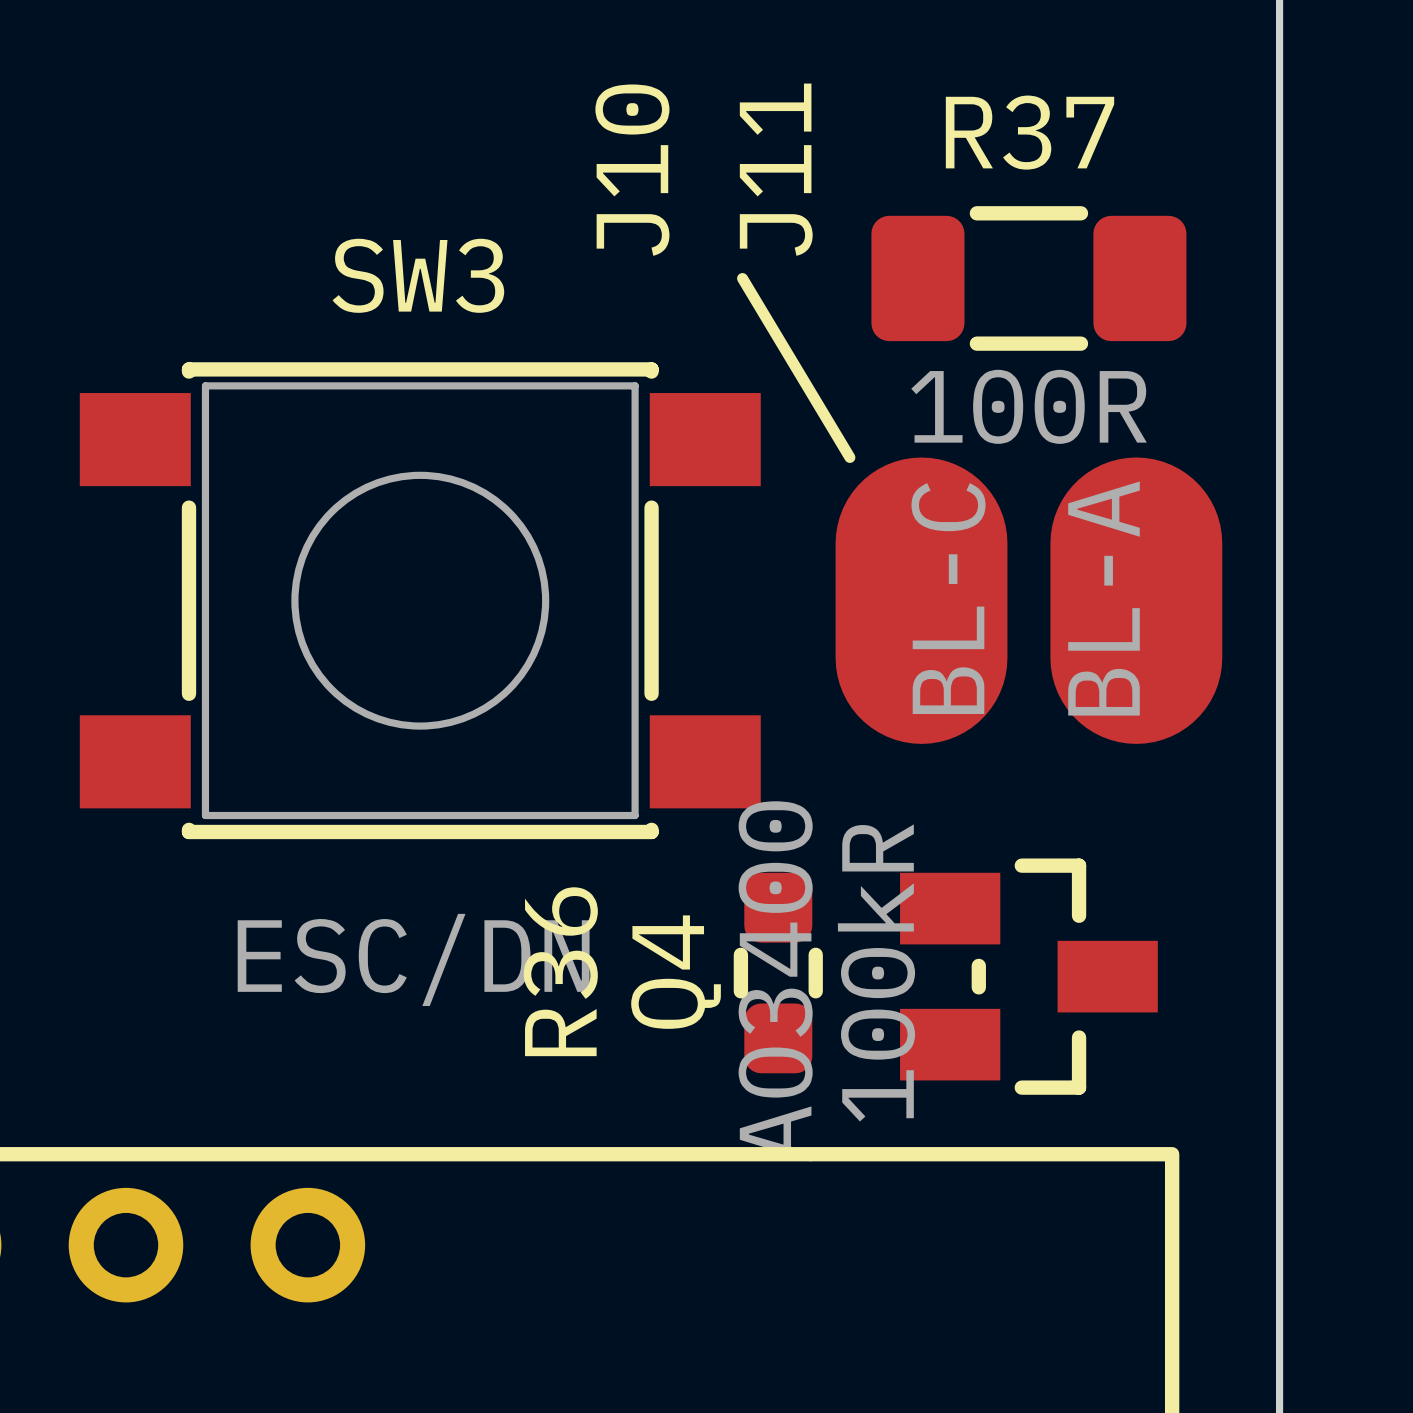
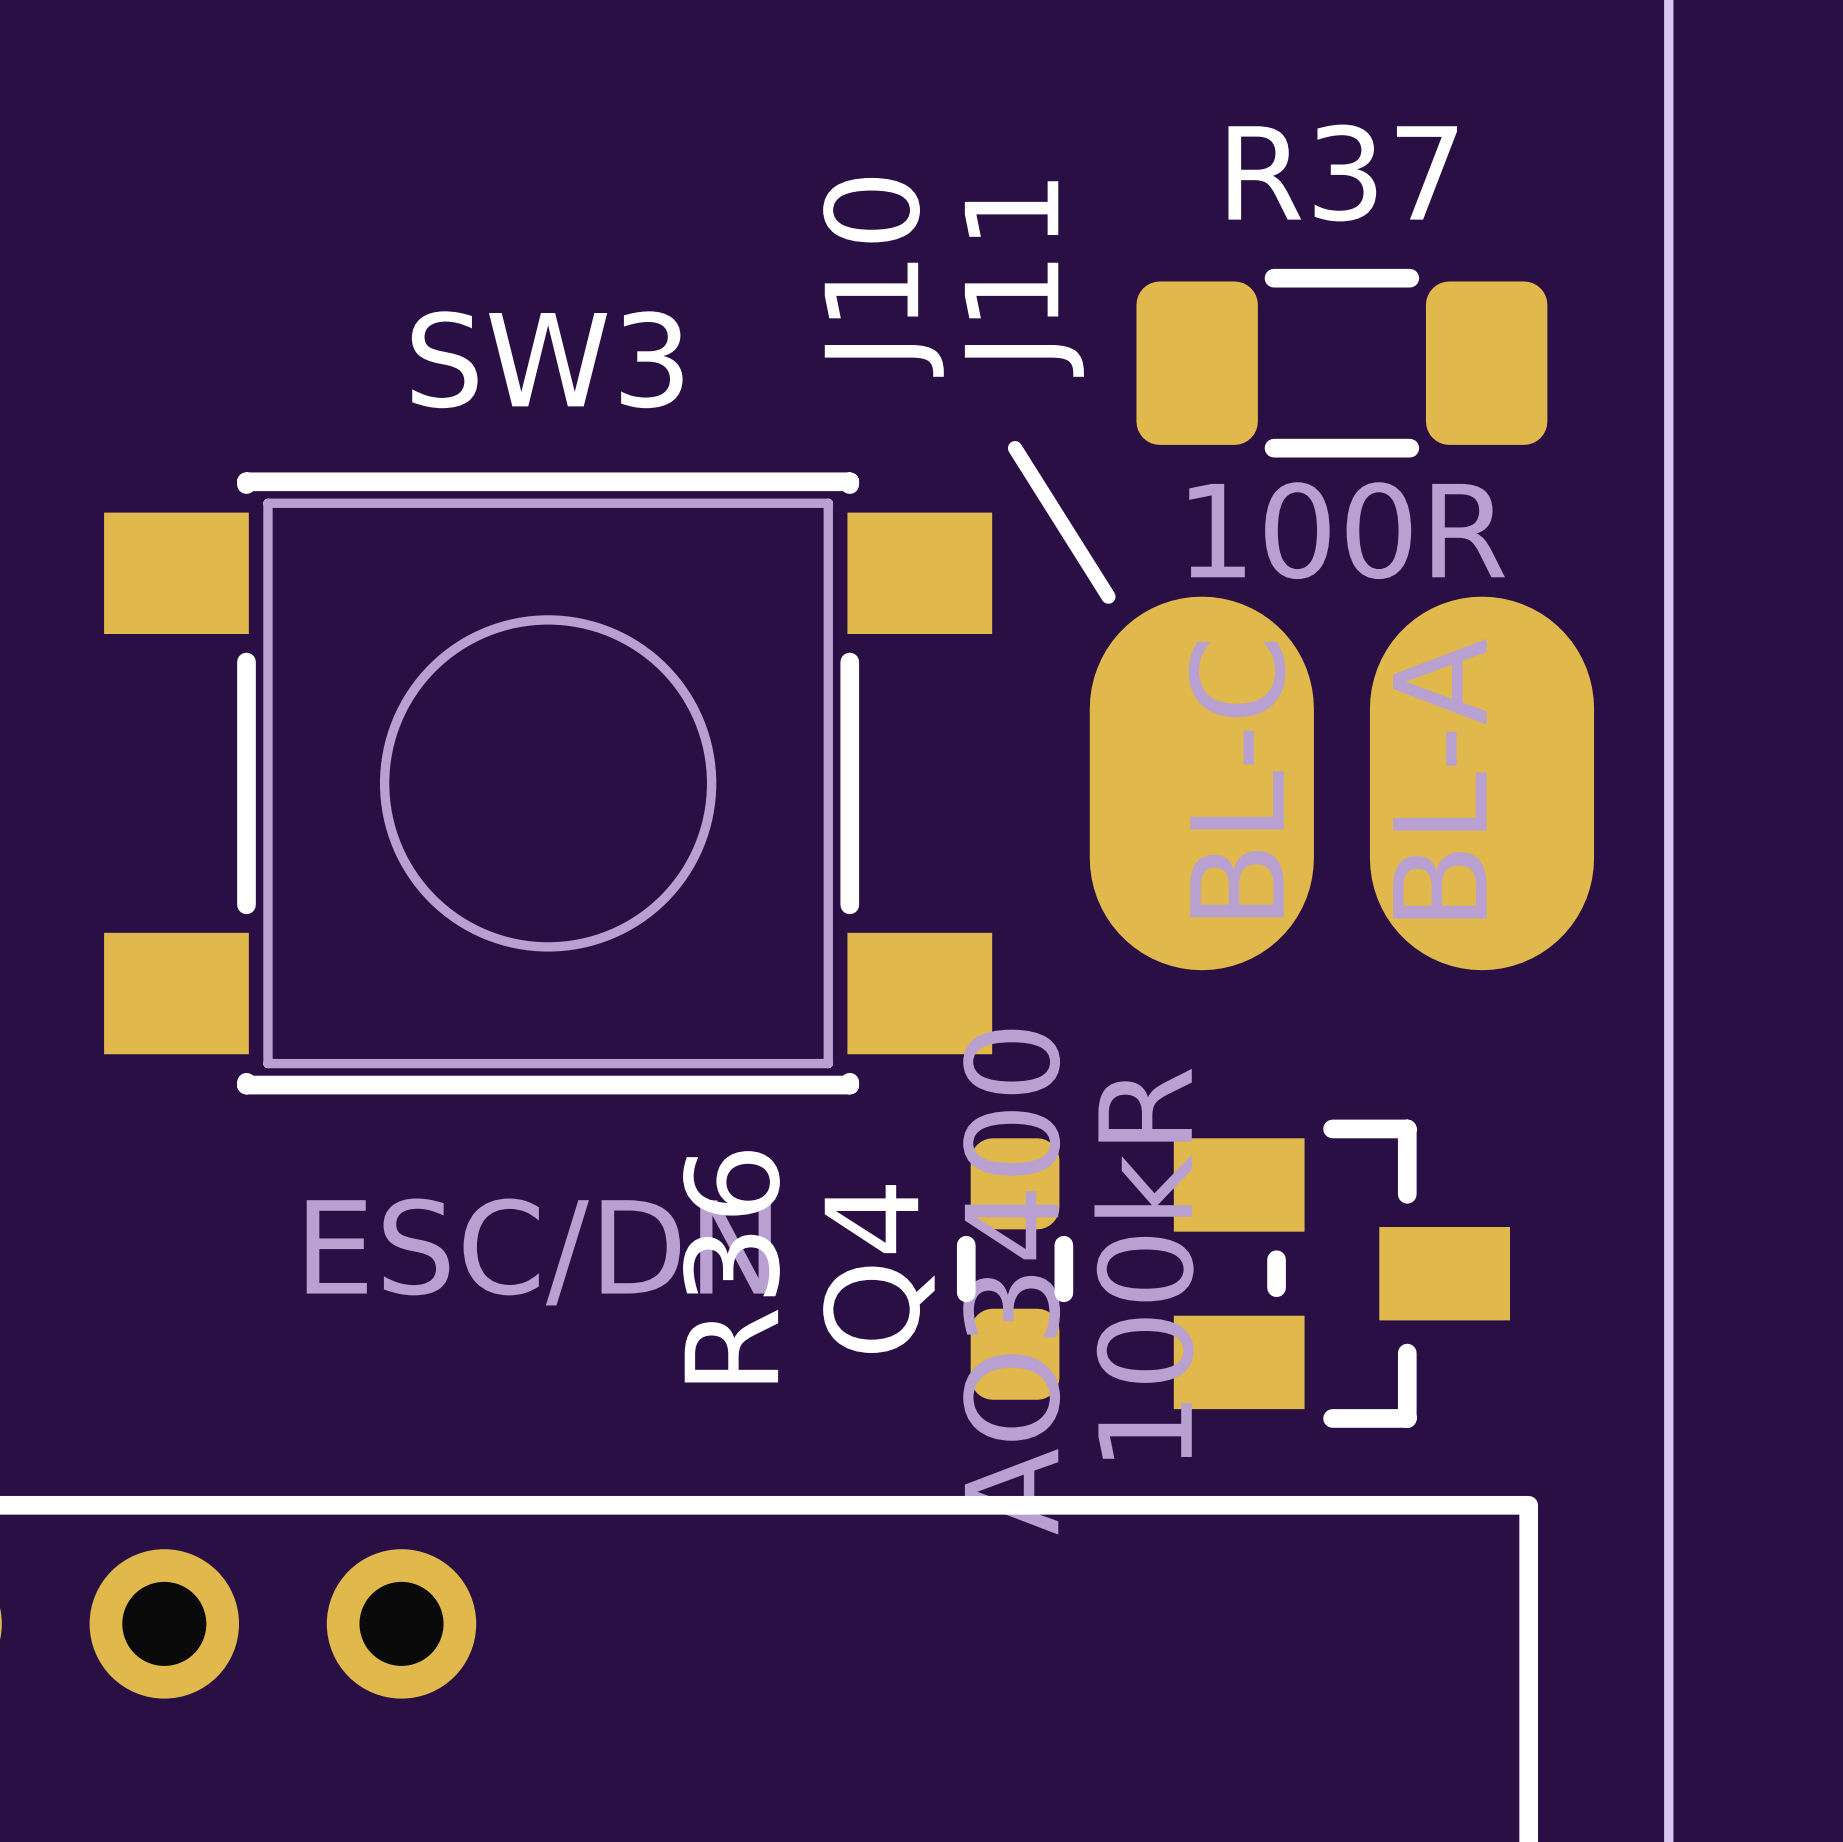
J11 name position: J11 (776, 169) -> J11 (1024, 279)
J10 name position: J10 (632, 170) -> J10 (883, 277)
line: (742, 278) (849, 457) -> (1015, 448) (1108, 596)

